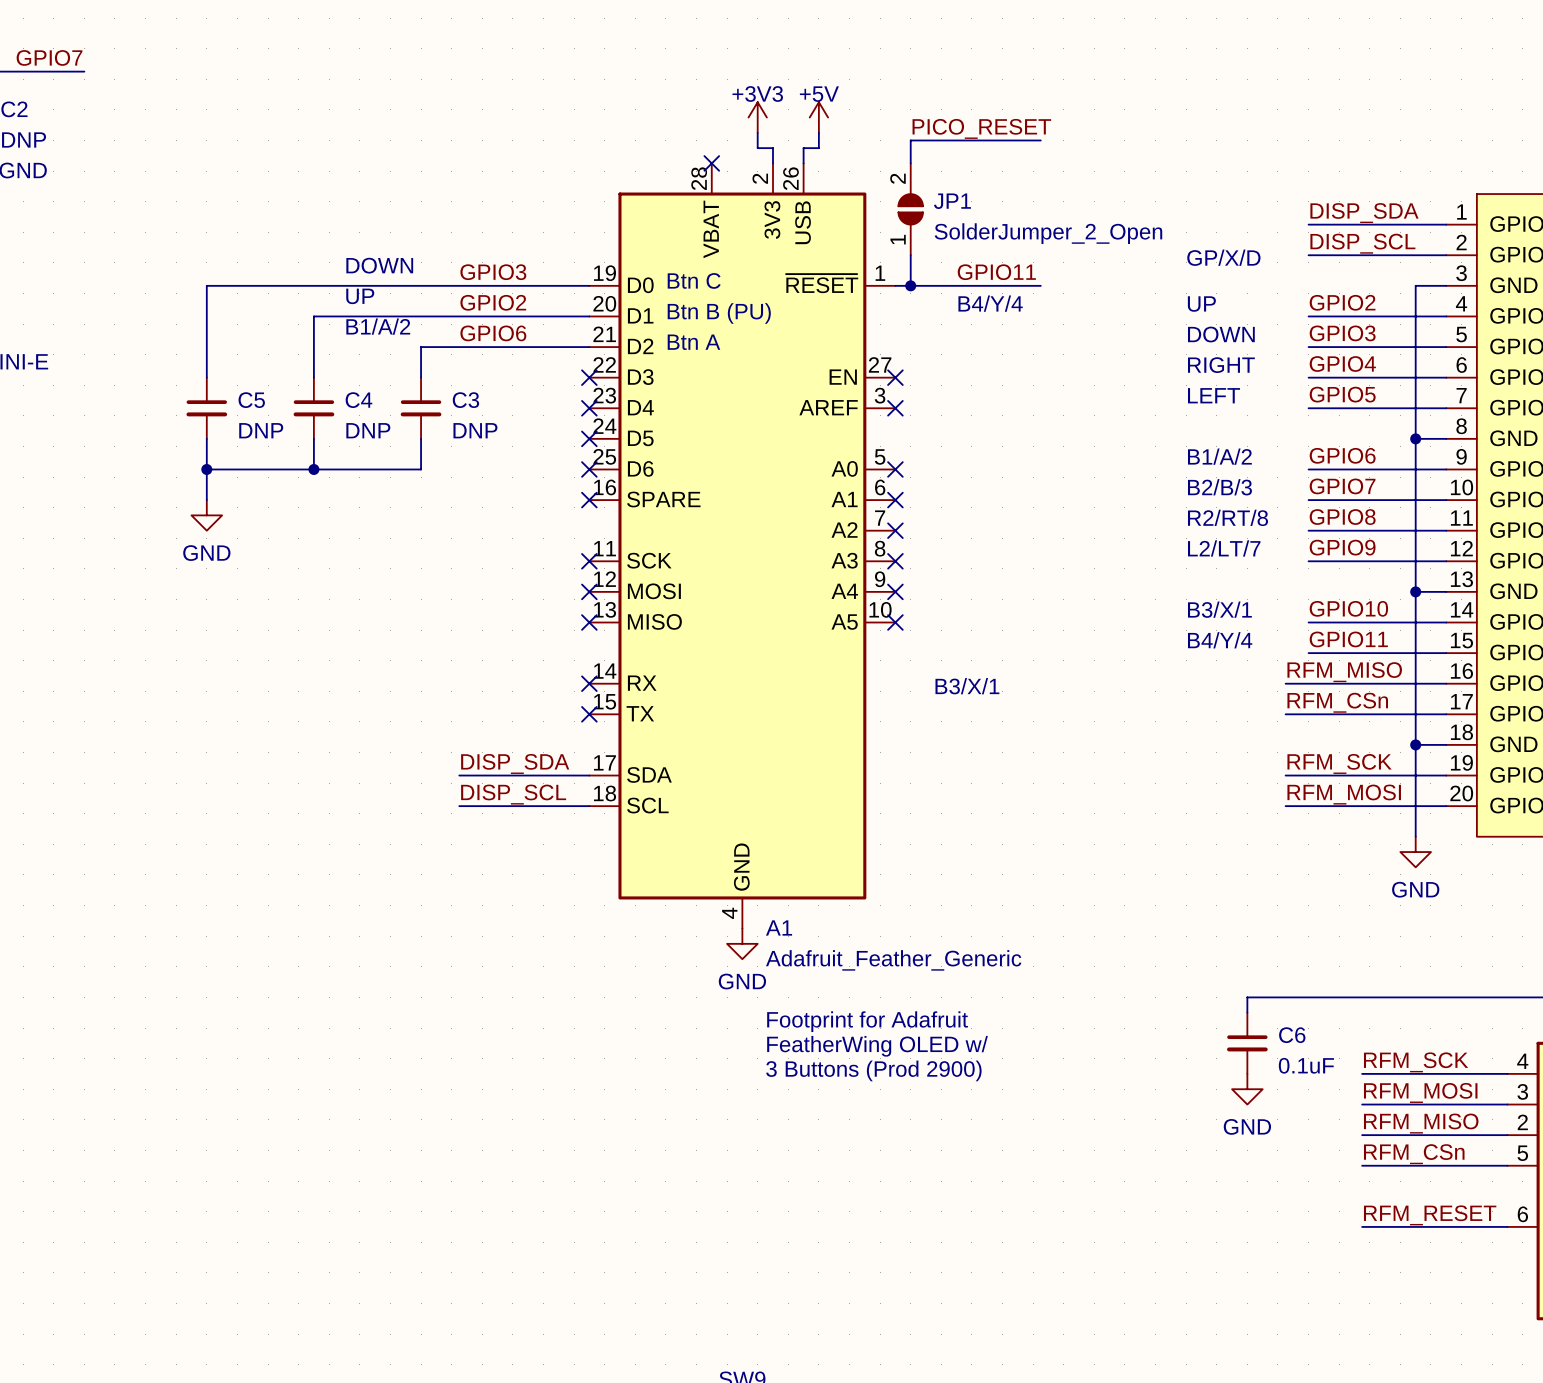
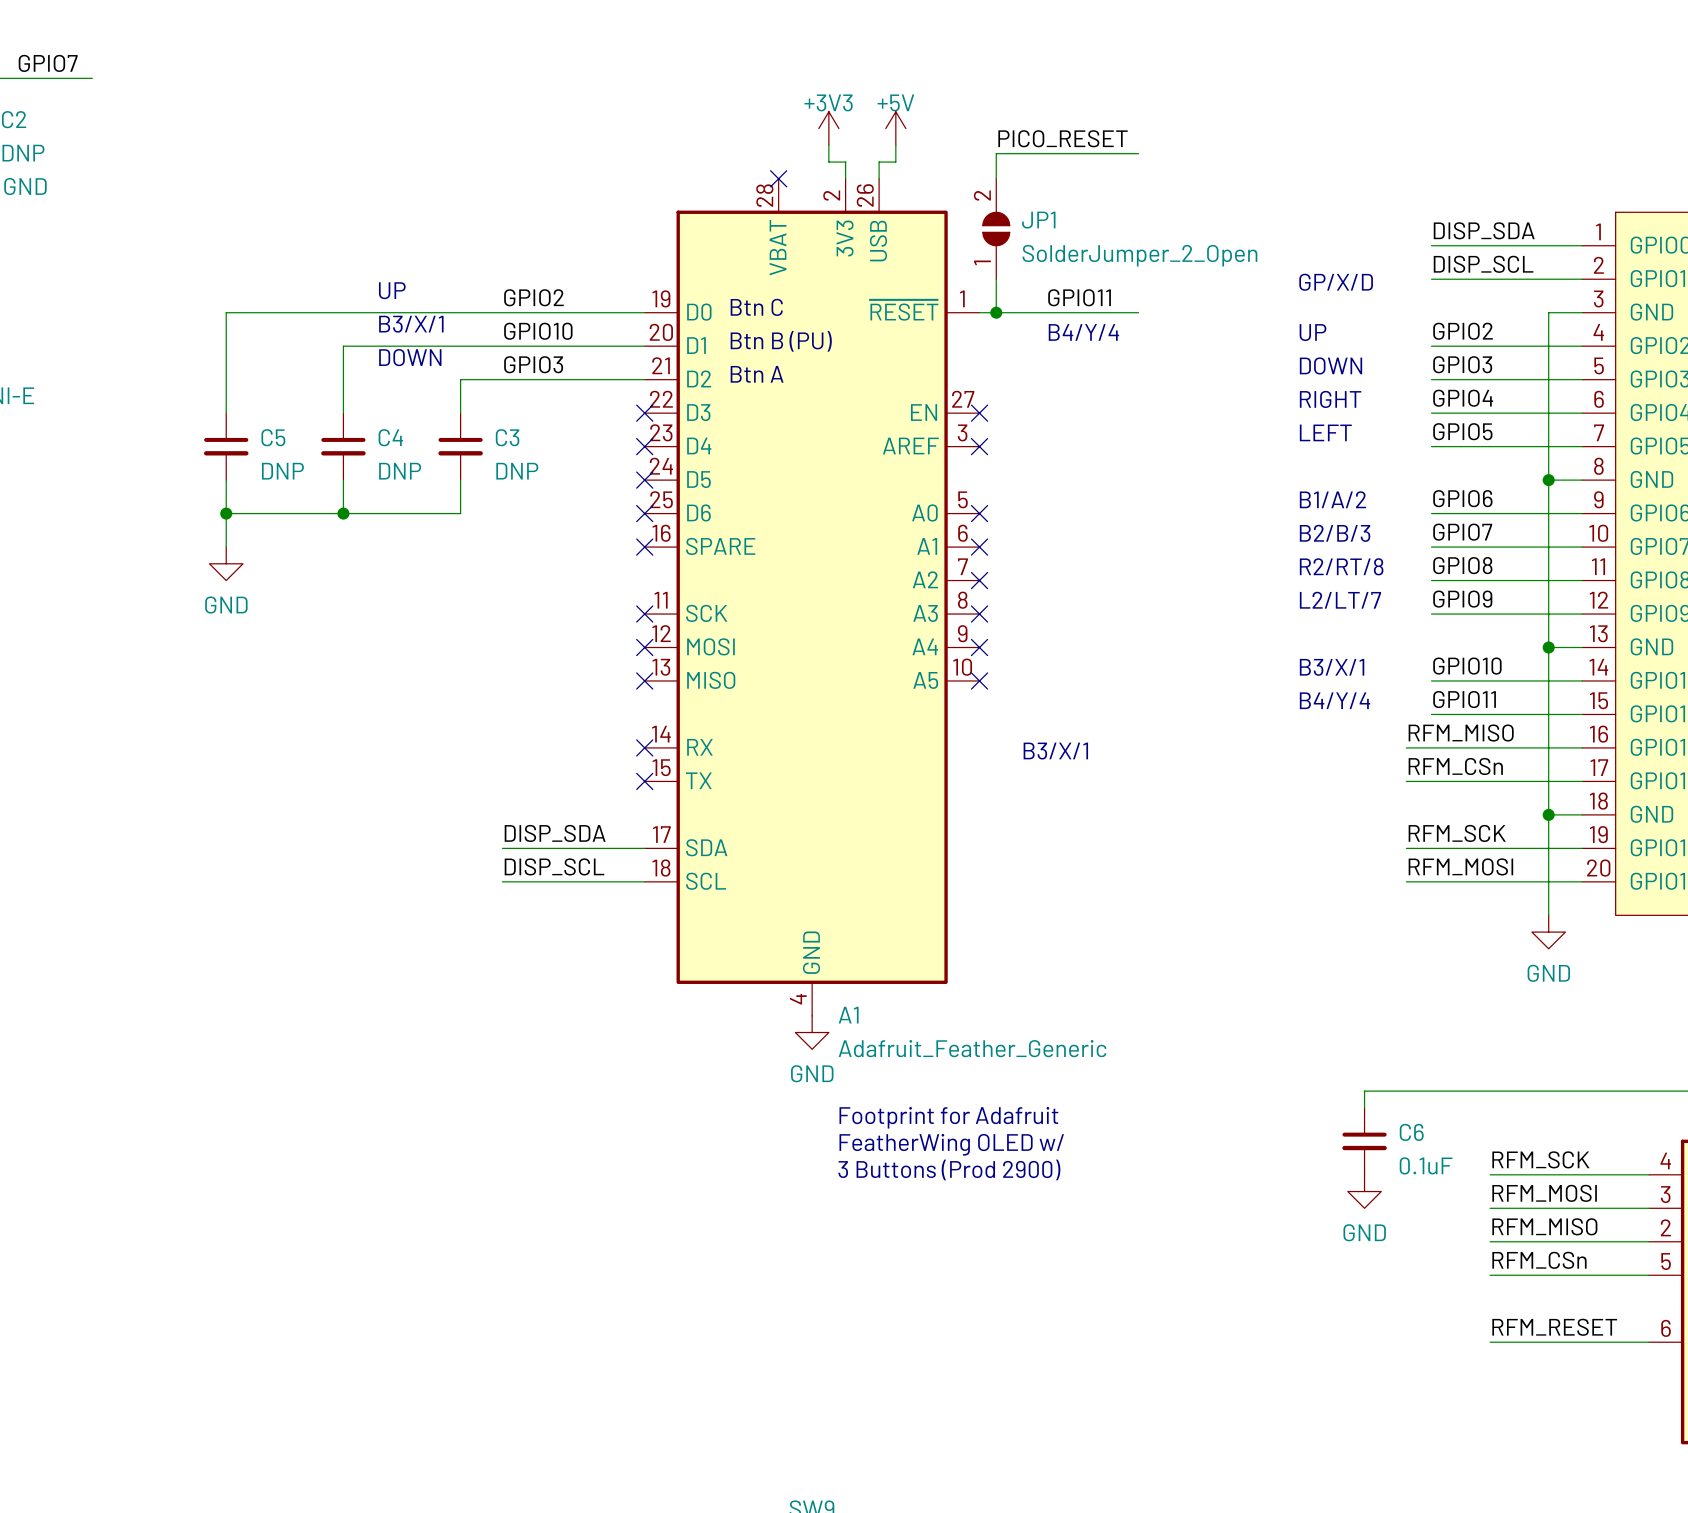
text: DOWN (379, 265) -> UP (392, 290)
label: GPIO3 (493, 272) -> GPIO2 (533, 297)
text: UP (360, 296) -> B3/X/1 (411, 324)
label: GPIO2 (493, 302) -> GPIO10 (538, 331)
text: B1/A/2 (378, 326) -> DOWN (410, 357)
label: GPIO6 (493, 333) -> GPIO3 (533, 364)

